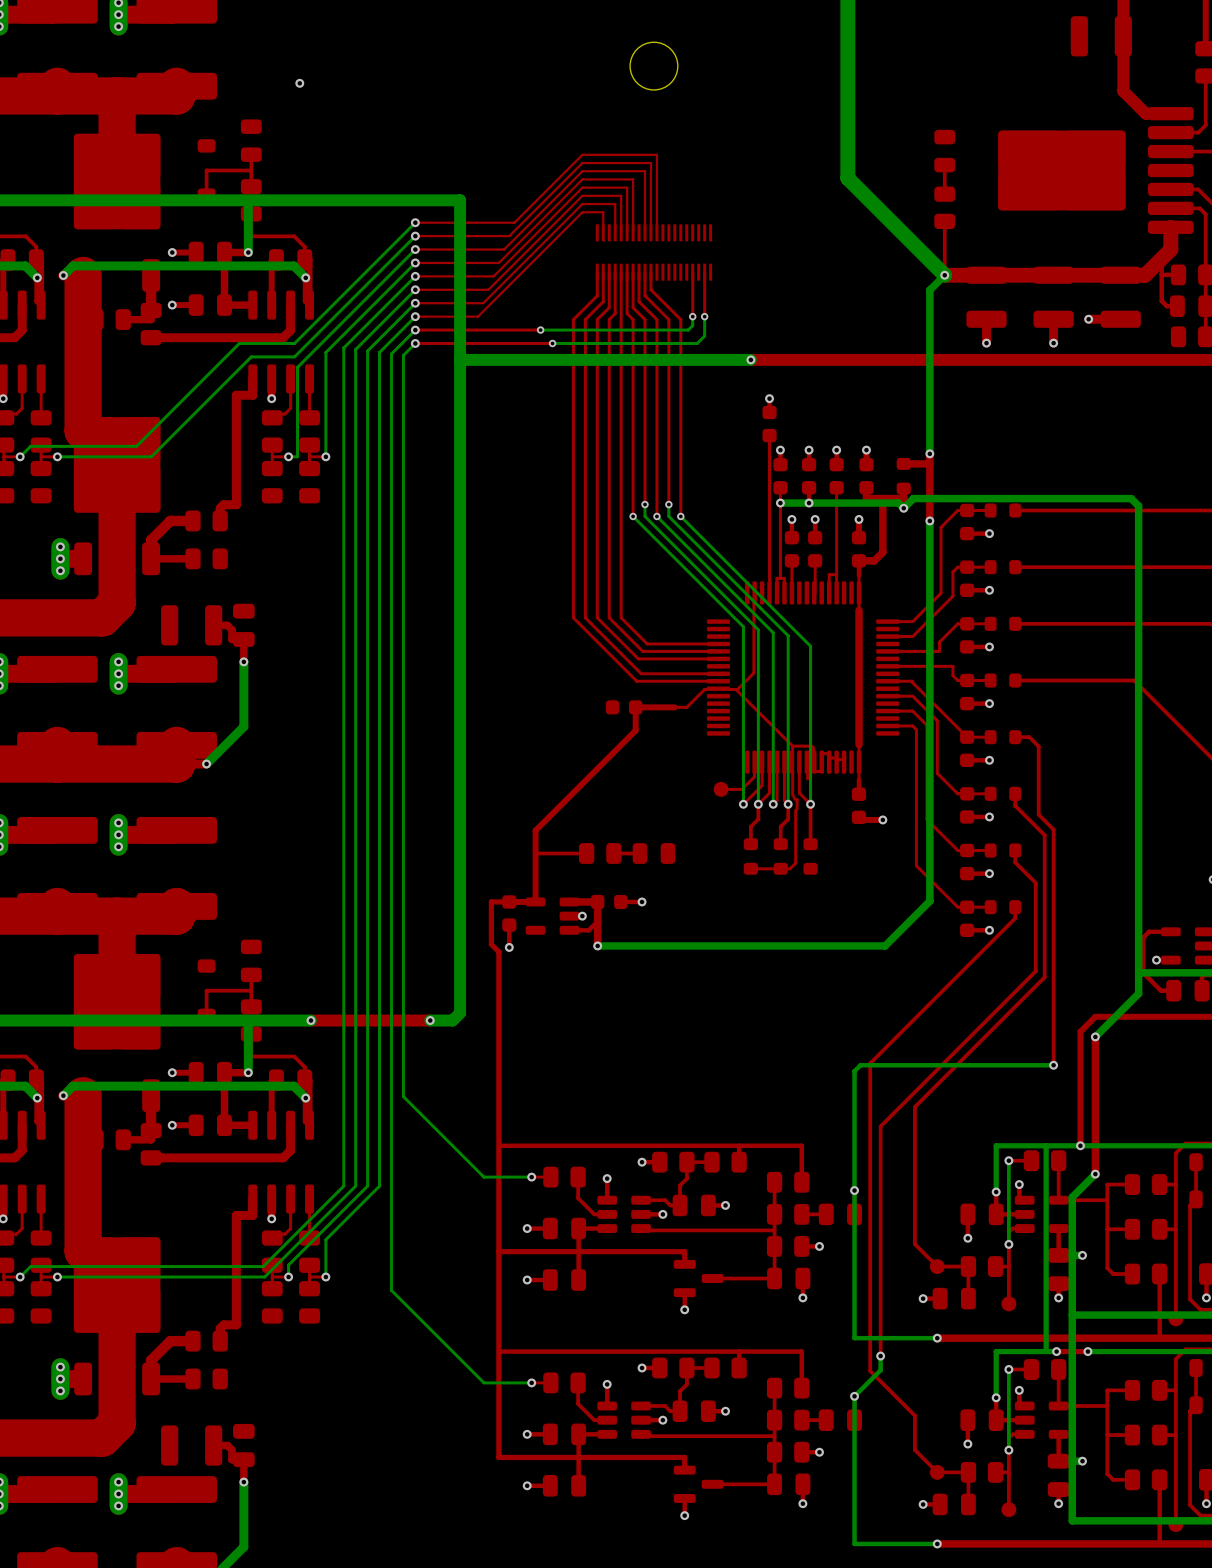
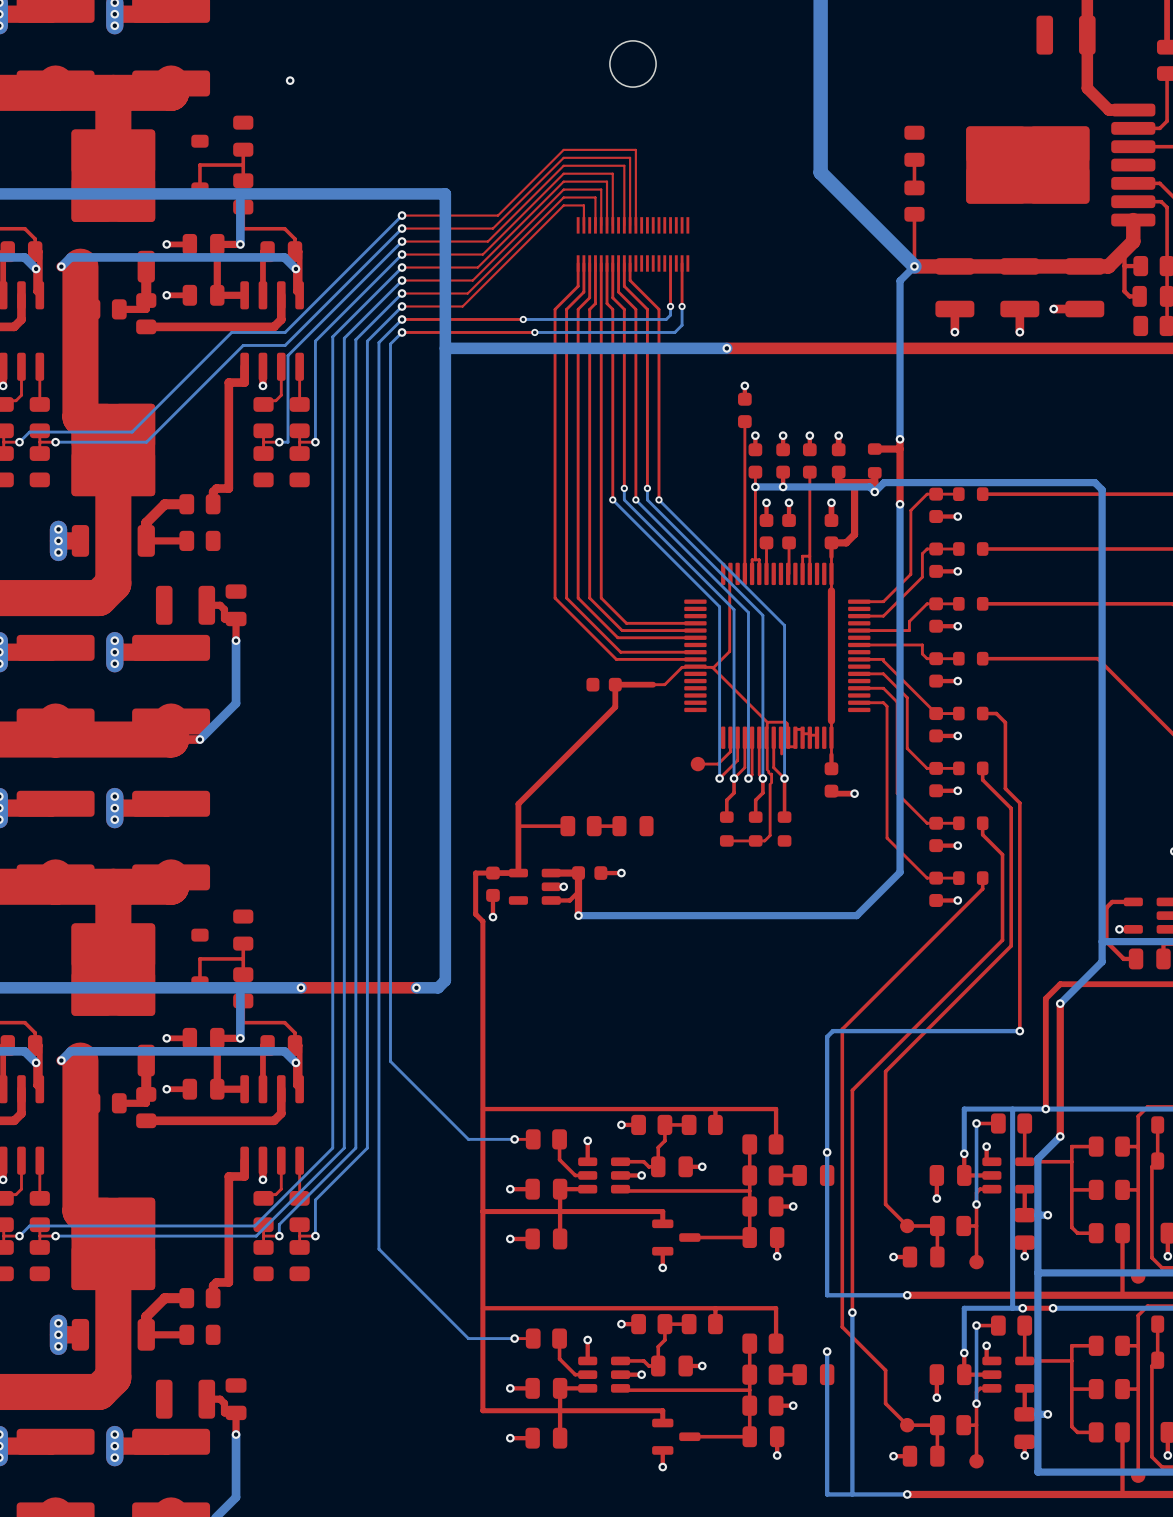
bottom track: (880, 1370) (854, 1396) -> (852, 1326) (852, 1494)

